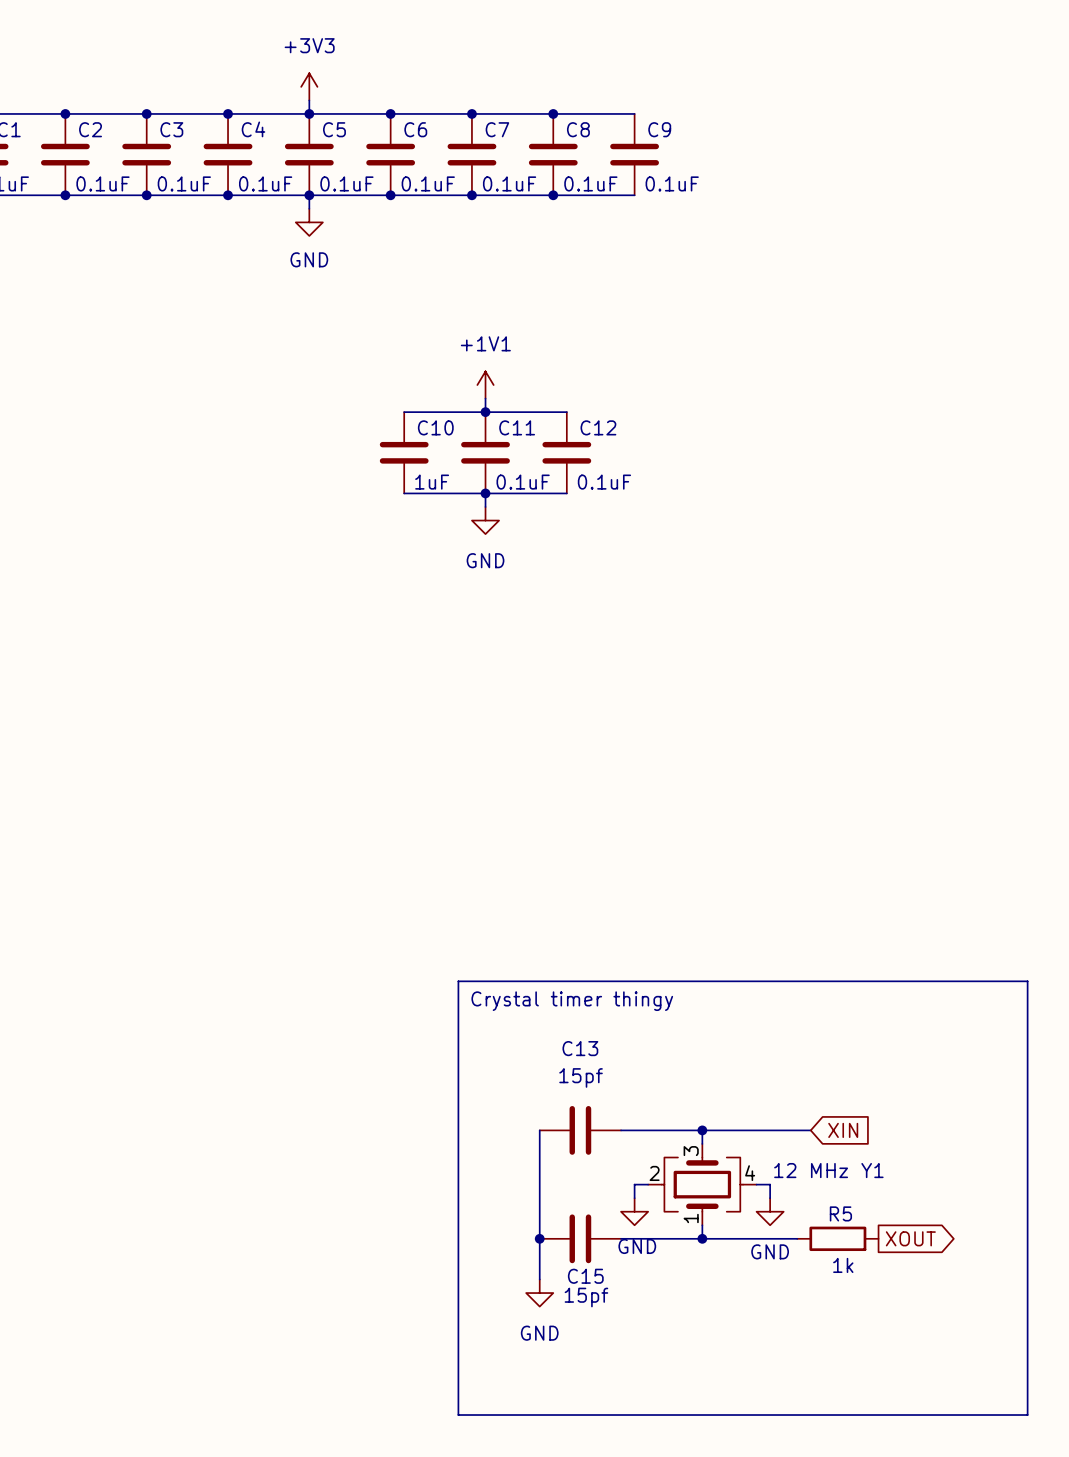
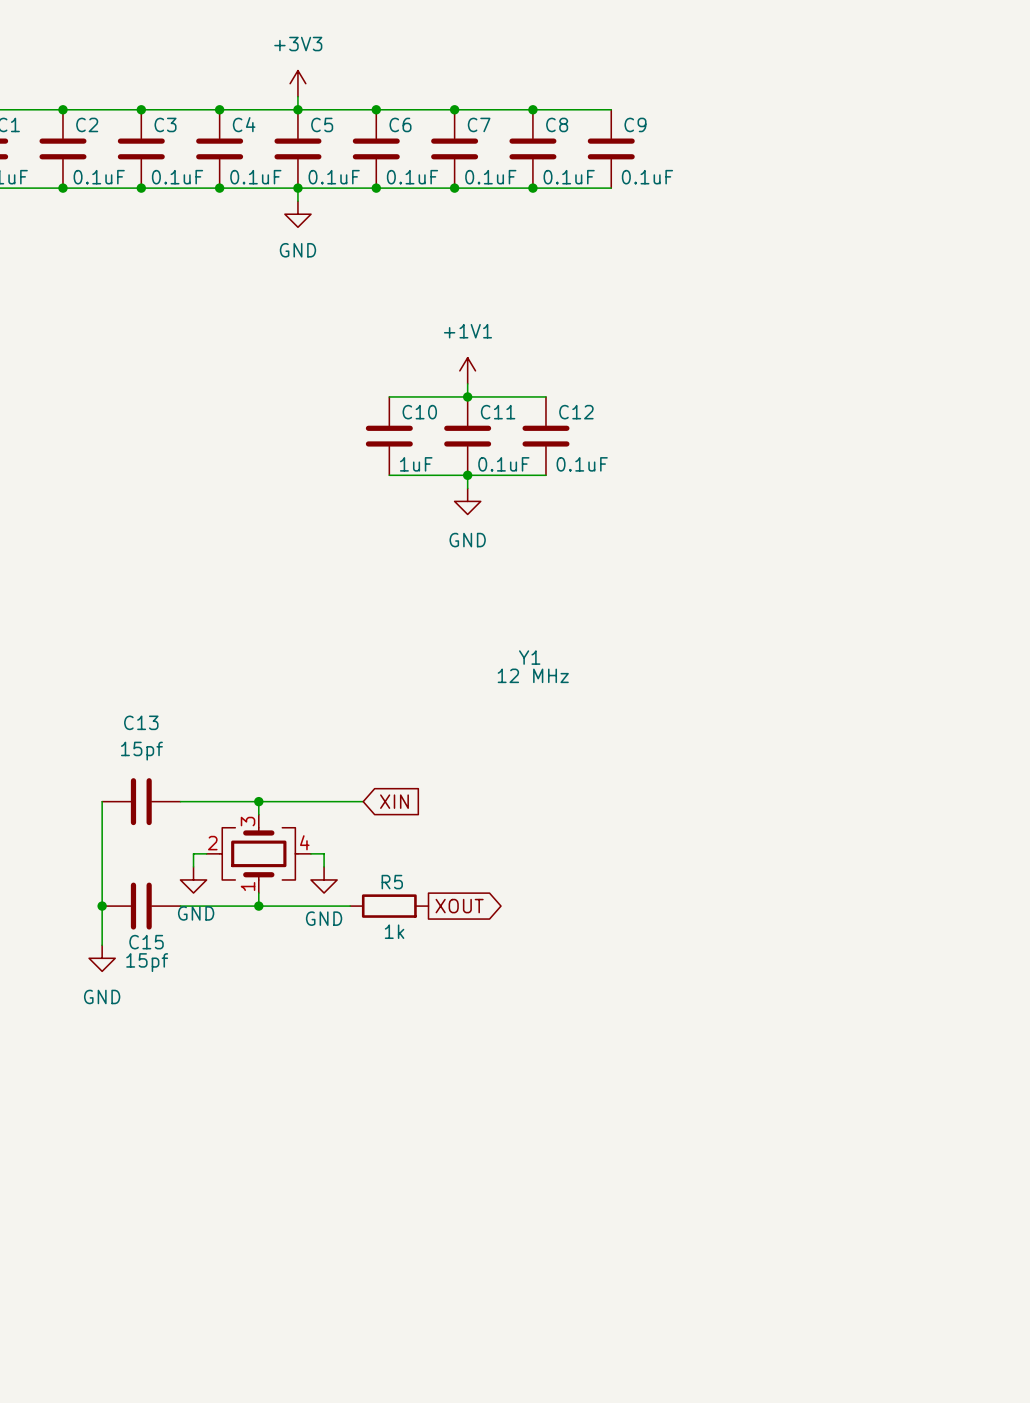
wire: none -> (102, 801) (102, 945)
wire: none -> (180, 801) (363, 801)
wire: none -> (258, 801) (258, 814)
junction: none -> (258, 801)
global label: none -> XIN (394, 801)
wire: none -> (206, 853) (193, 853) (193, 866)
wire: none -> (311, 853) (324, 853) (324, 866)
power symbol: none -> GND (193, 879)
power symbol: none -> GND (324, 879)
wire: none -> (258, 893) (258, 906)
junction: none -> (102, 906)
wire: none -> (180, 906) (350, 906)
junction: none -> (258, 906)
global label: none -> XOUT (459, 906)
line: (458, 981) (1027, 981) (1027, 1415) (458, 1415) (458, 981) -> none
power symbol: none -> GND (102, 958)
text: Crystal timer thingy (572, 1001) -> none
wire: (539, 1130) (539, 1279) -> none
C13 position: (580, 1130) -> (141, 801)
wire: (621, 1130) (810, 1130) -> none
wire: (702, 1130) (702, 1143) -> none
junction: (702, 1130) -> none
global label: XIN (843, 1130) -> none
Y1 value position: 12 MHz (811, 1170) -> 12 MHz (533, 675)
Y1 name position: Y1 (872, 1170) -> Y1 (529, 657)
wire: (648, 1184) (634, 1184) (634, 1198) -> none
Y1 position: (702, 1184) -> (258, 853)
wire: (756, 1184) (770, 1184) (770, 1198) -> none
power symbol: GND (634, 1211) -> none
power symbol: GND (770, 1211) -> none
wire: (702, 1225) (702, 1238) -> none
junction: (539, 1238) -> none
C15 position: (580, 1238) -> (141, 906)
wire: (621, 1238) (797, 1238) -> none
junction: (702, 1238) -> none
R5 position: (837, 1238) -> (389, 906)
global label: XOUT (910, 1238) -> none
power symbol: GND (539, 1293) -> none

